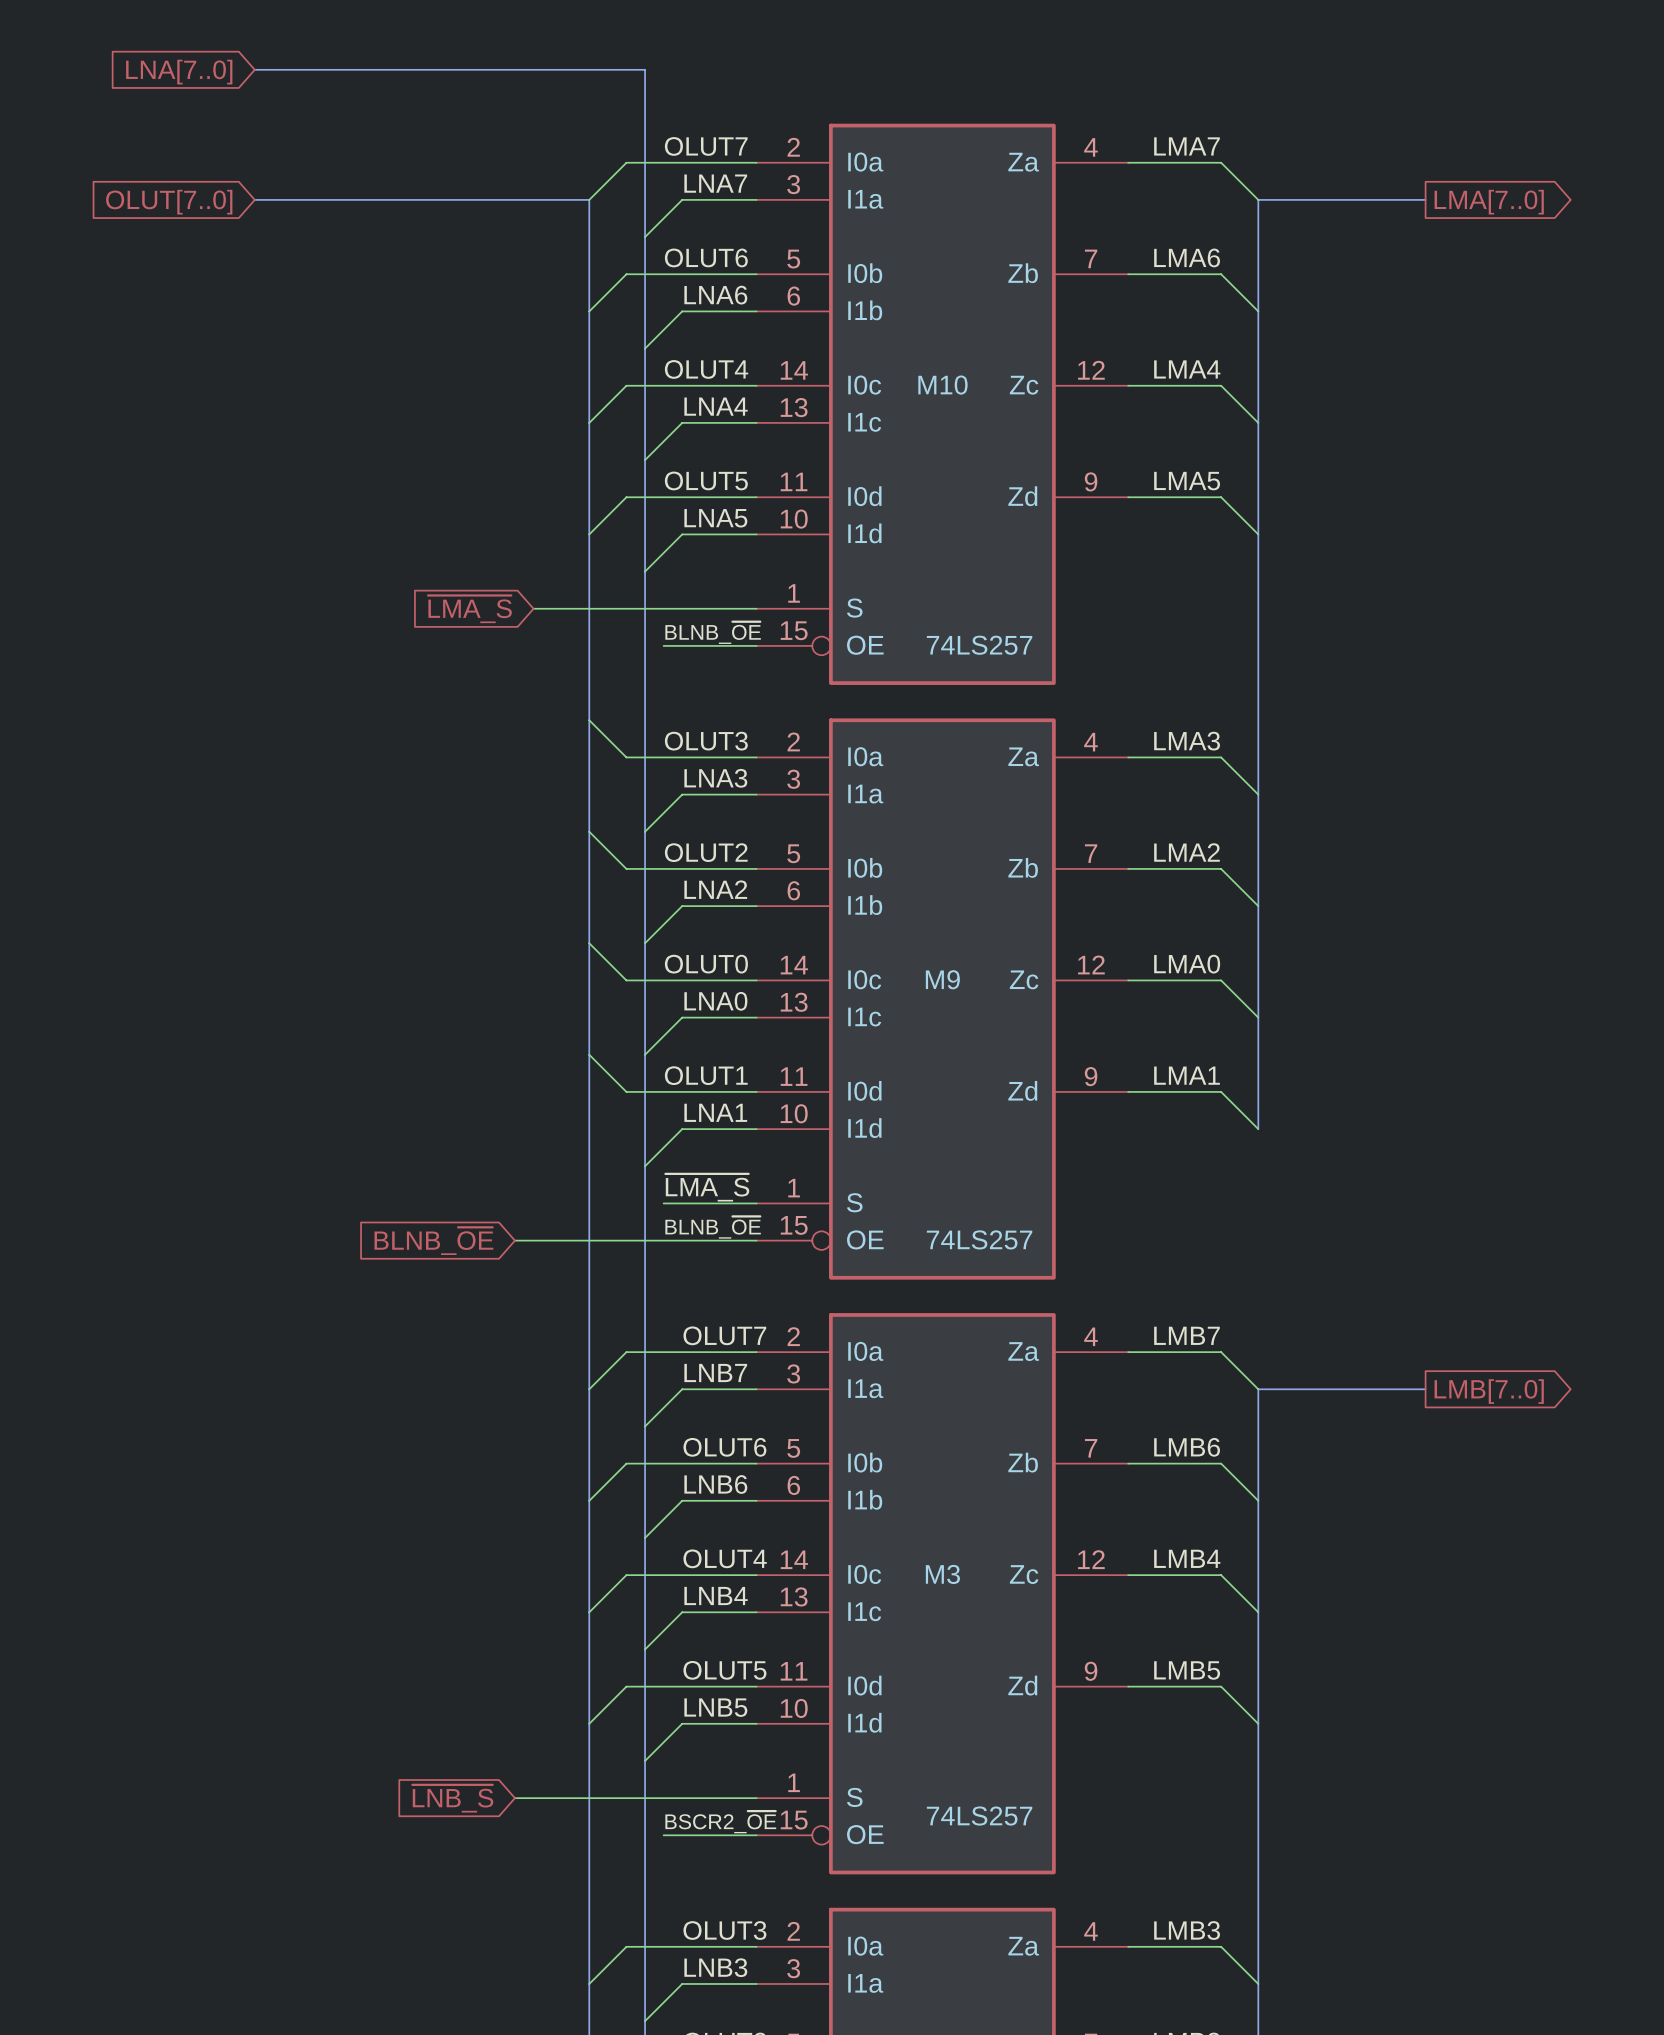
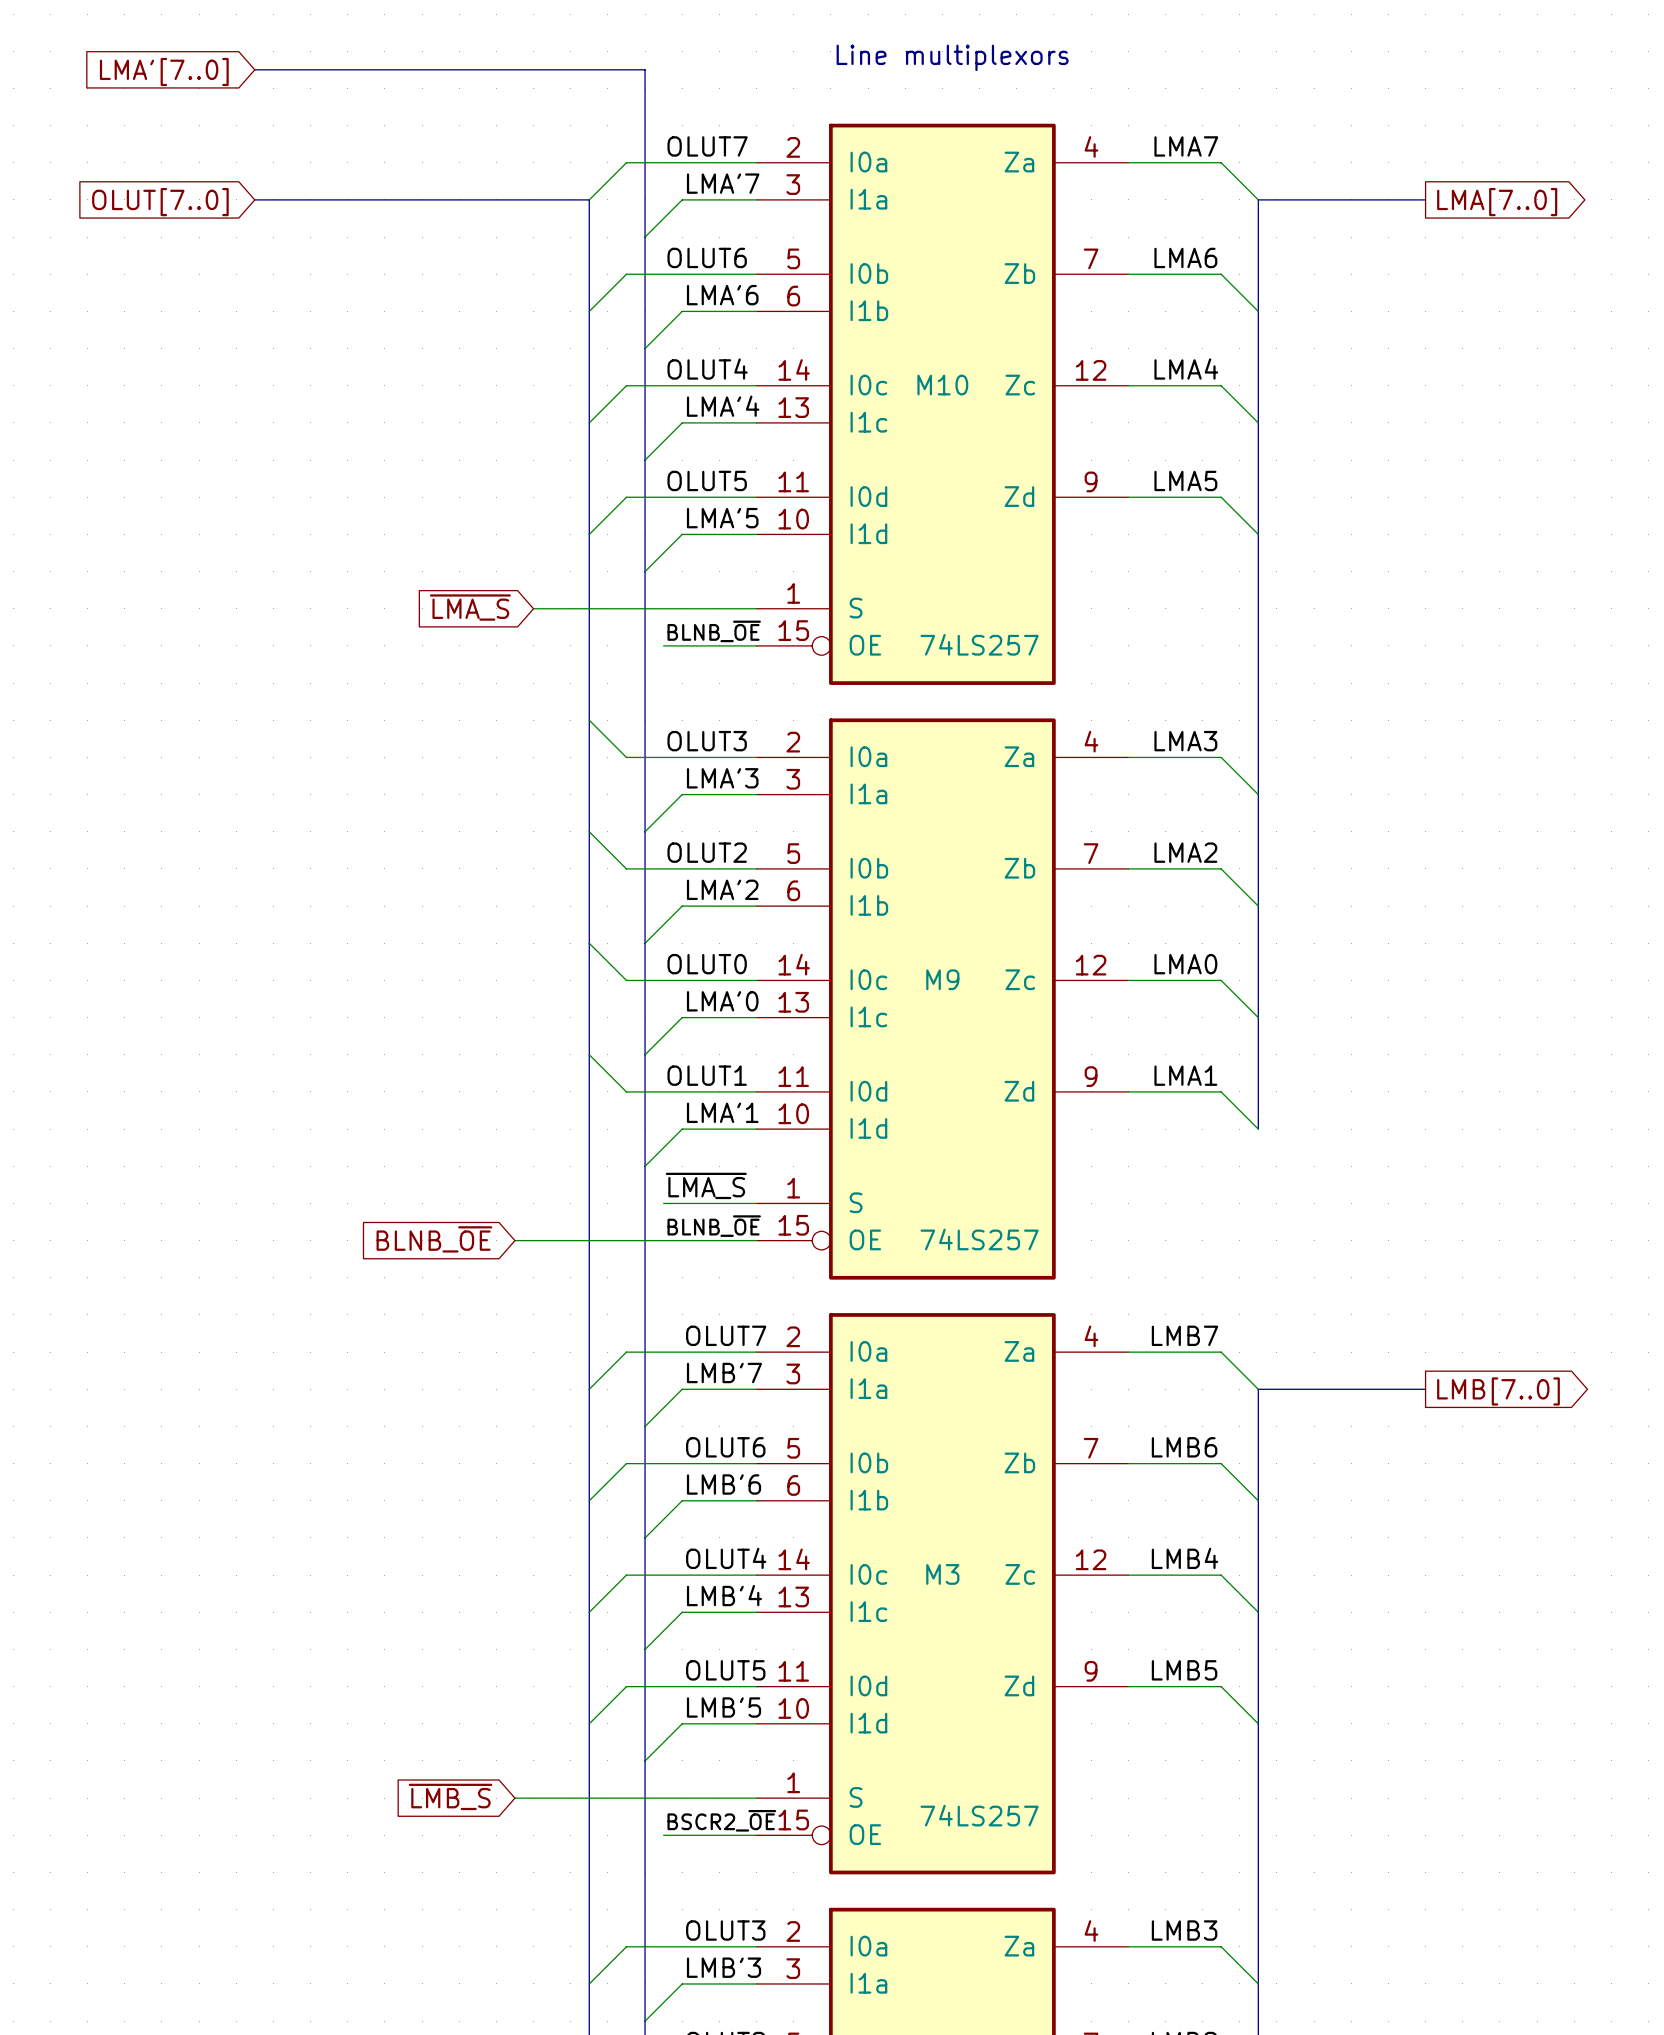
text: none -> Line multiplexors (952, 57)
global label: LNA[7..0] (179, 72) -> LMA'[7..0] (164, 71)
label: LNA7 (715, 183) -> LMA'7 (723, 183)
label: LNA6 (715, 295) -> LMA'6 (722, 295)
label: LNA4 (716, 406) -> LMA'4 (723, 406)
label: LNA5 (715, 518) -> LMA'5 (722, 518)
label: LNA3 (715, 778) -> LMA'3 (722, 778)
label: LNA2 (715, 889) -> LMA'2 (722, 889)
label: LNA0 (715, 1001) -> LMA'0 (722, 1001)
label: LNA1 (715, 1112) -> LMA'1 (722, 1112)
label: LNB7 (715, 1372) -> LMB'7 (724, 1372)
label: LNB6 (715, 1484) -> LMB'6 (724, 1484)
label: LNB4 (716, 1596) -> LMB'4 (724, 1595)
label: LNB5 (715, 1707) -> LMB'5 (724, 1707)
global label: ~{LNB_S} (452, 1798) -> ~{LMB_S} (450, 1796)
label: LNB3 (715, 1967) -> LMB'3 (724, 1967)

